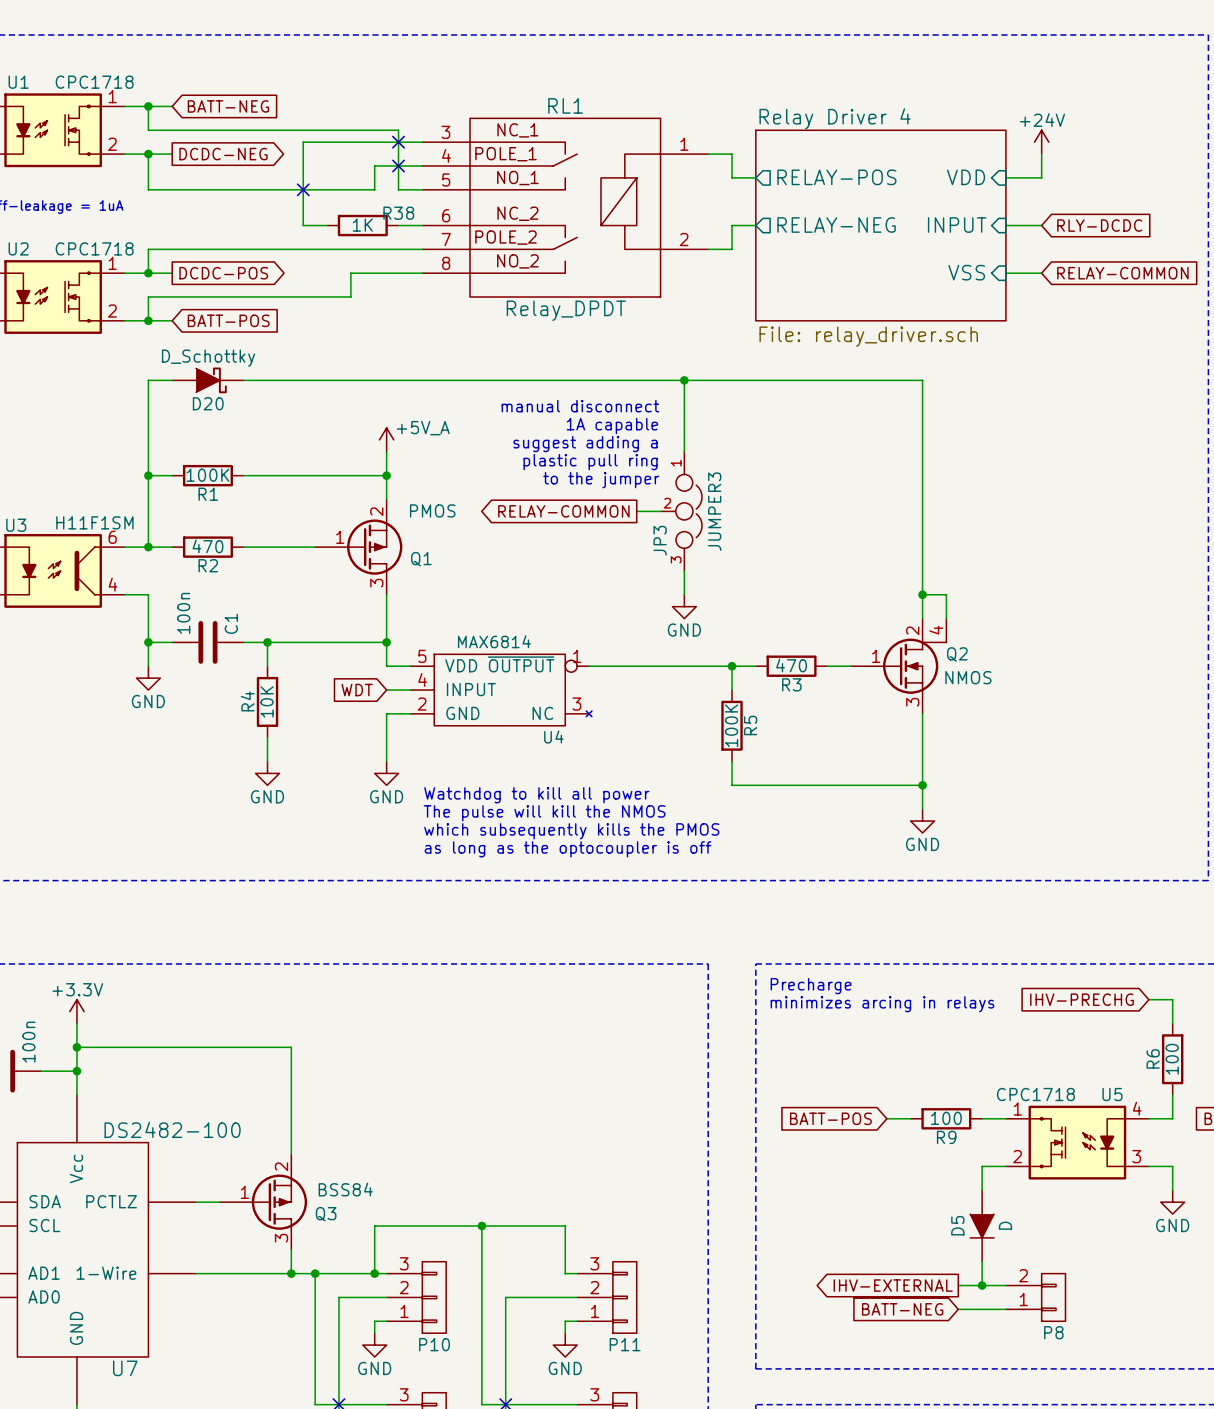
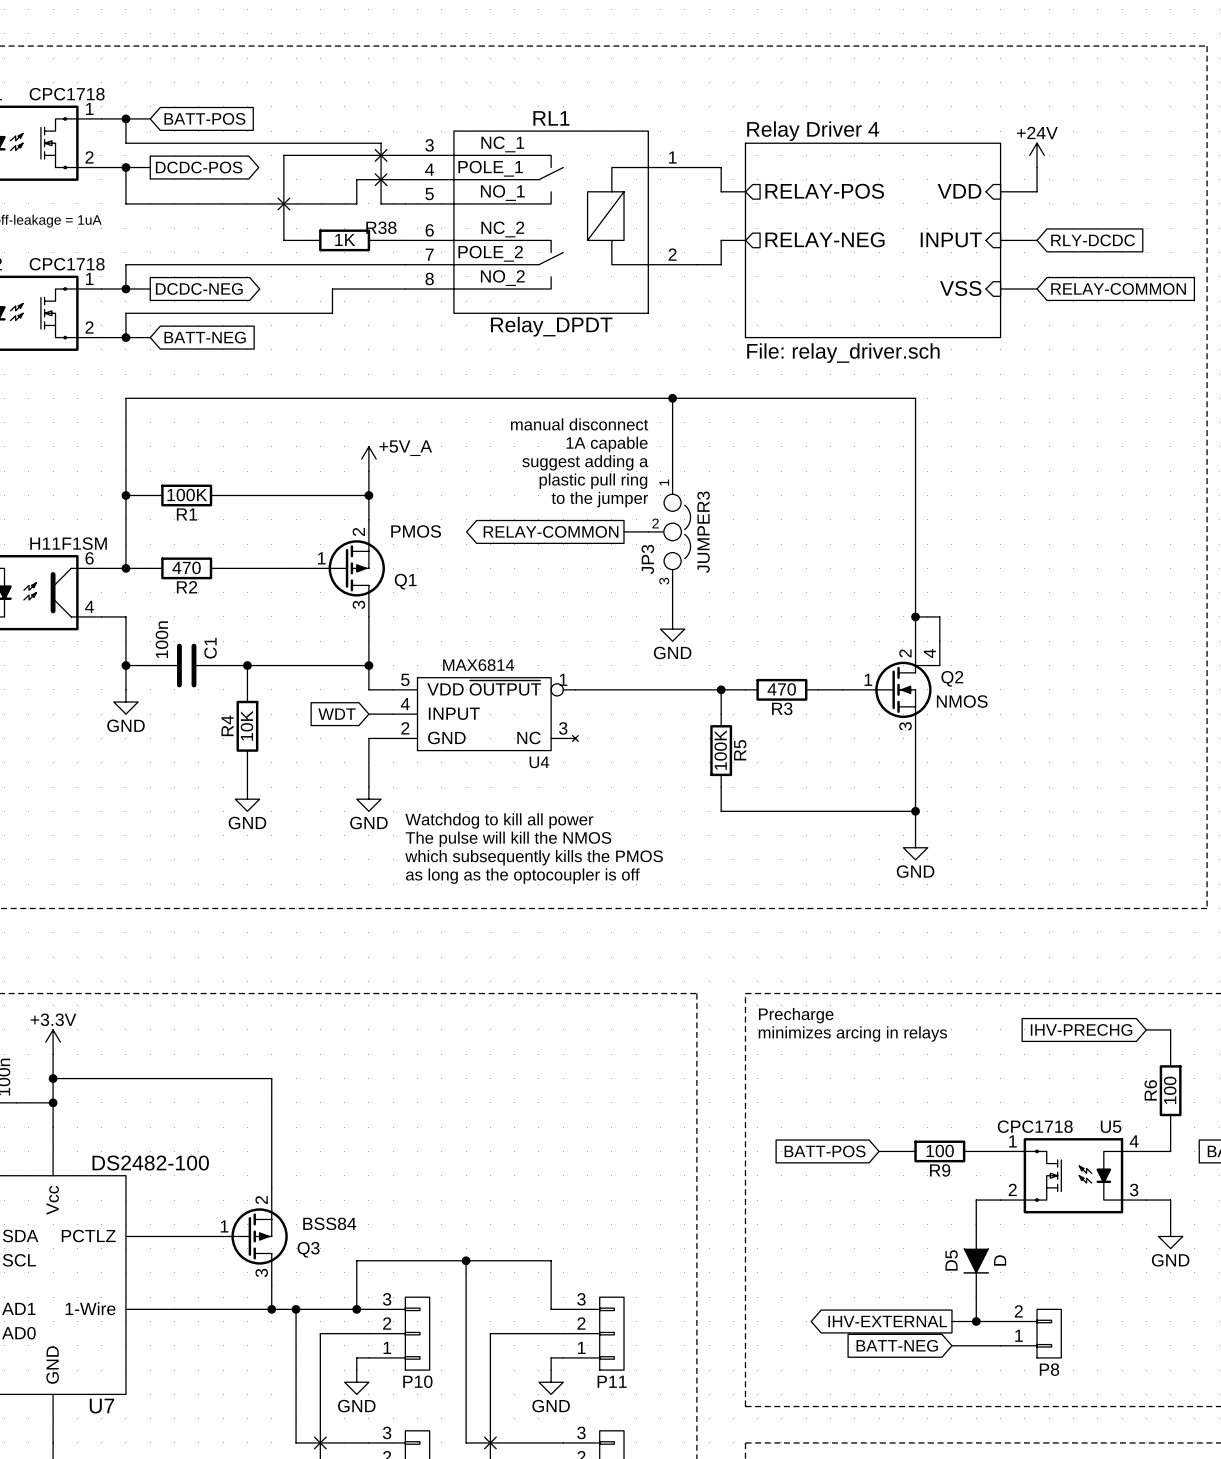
global label: BATT-NEG (228, 106) -> BATT-POS (204, 118)
global label: DCDC-NEG (223, 154) -> DCDC-POS (199, 167)
global label: DCDC-POS (223, 273) -> DCDC-NEG (199, 288)
global label: BATT-POS (228, 320) -> BATT-NEG (205, 337)
D20: D_Schottky (207, 380) -> none

